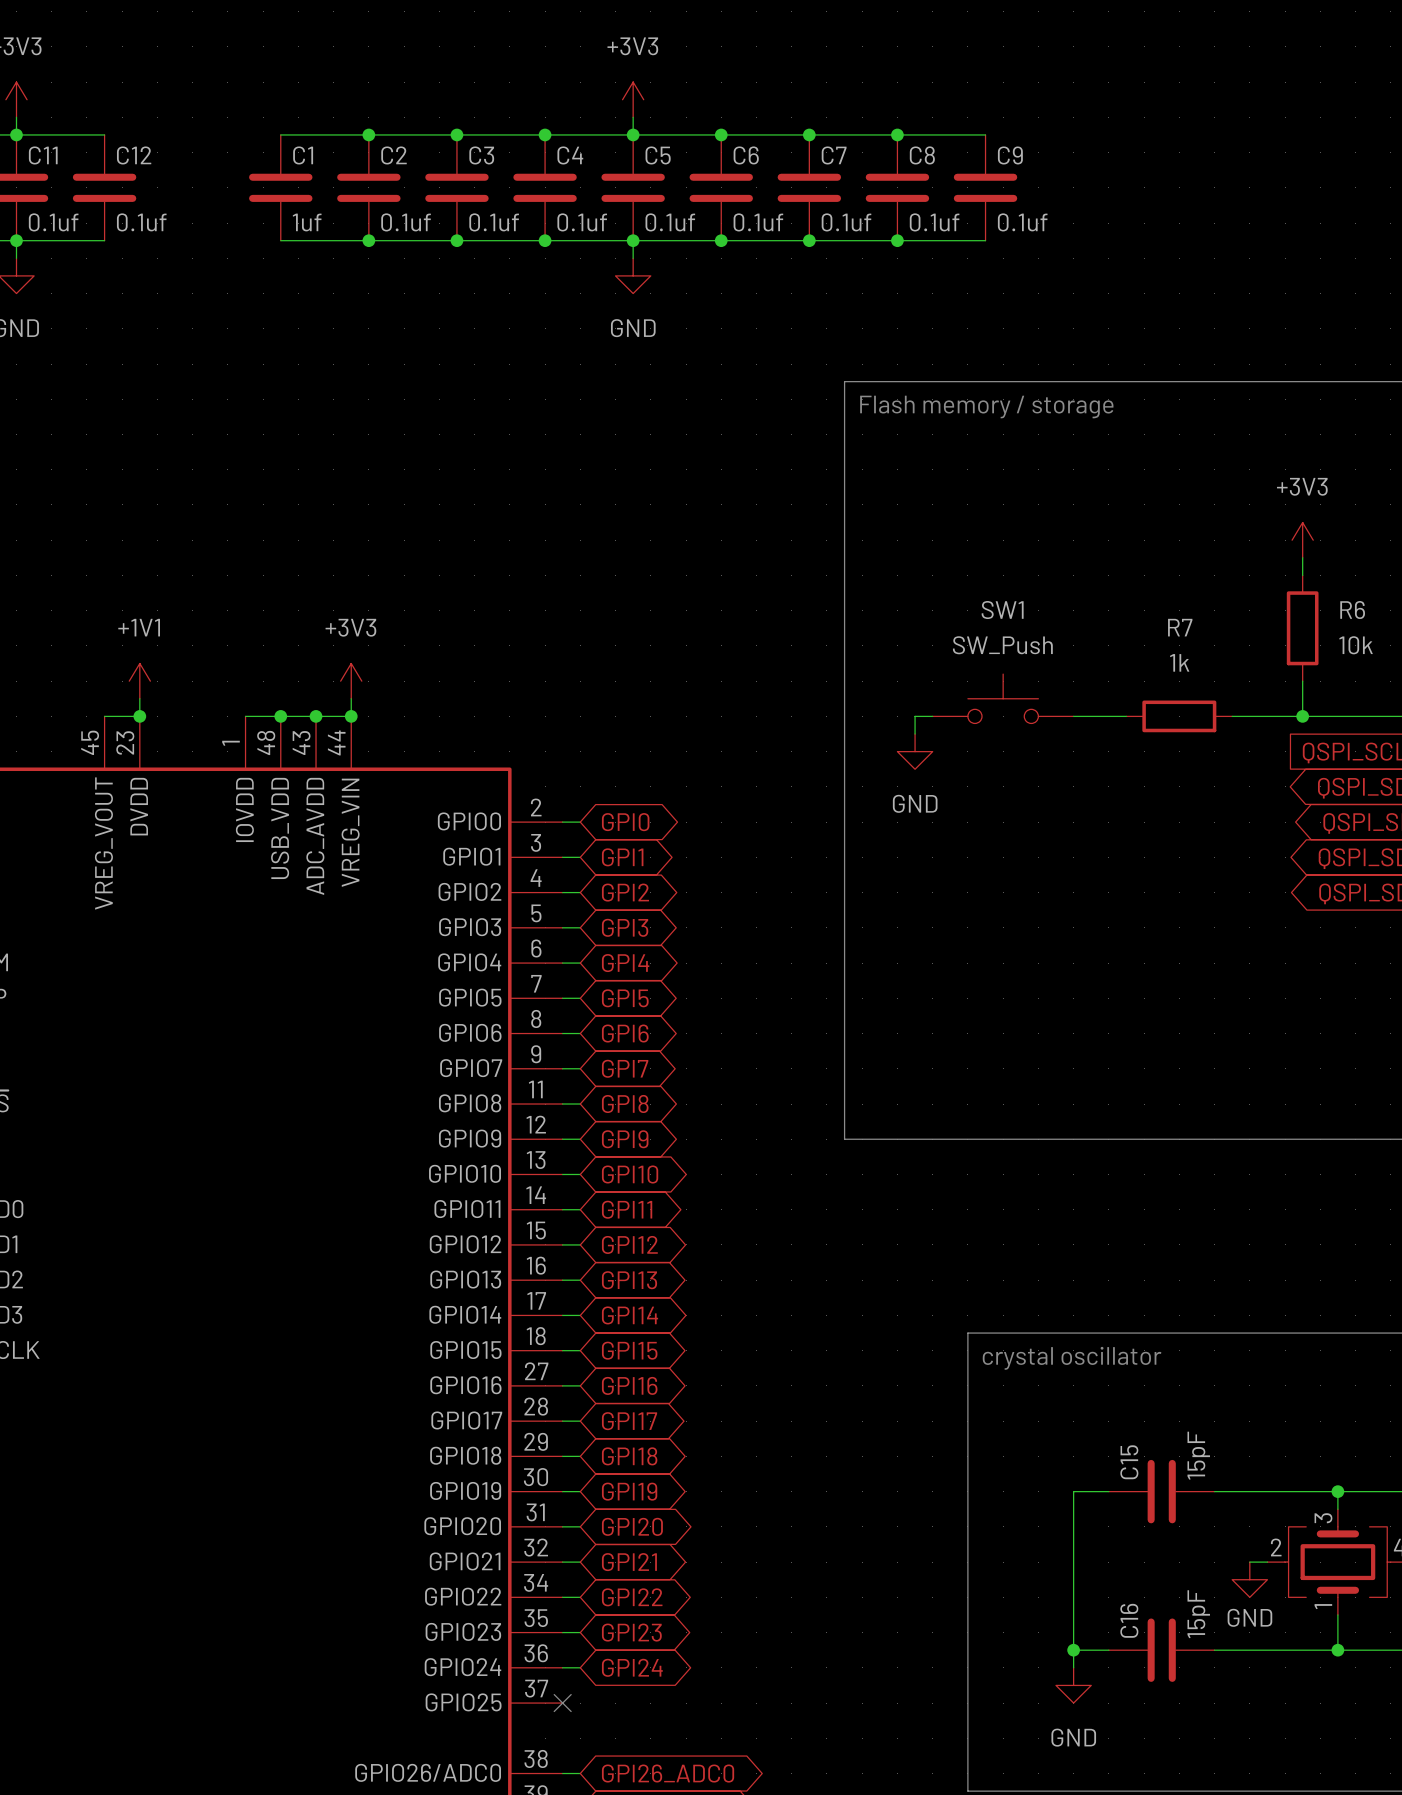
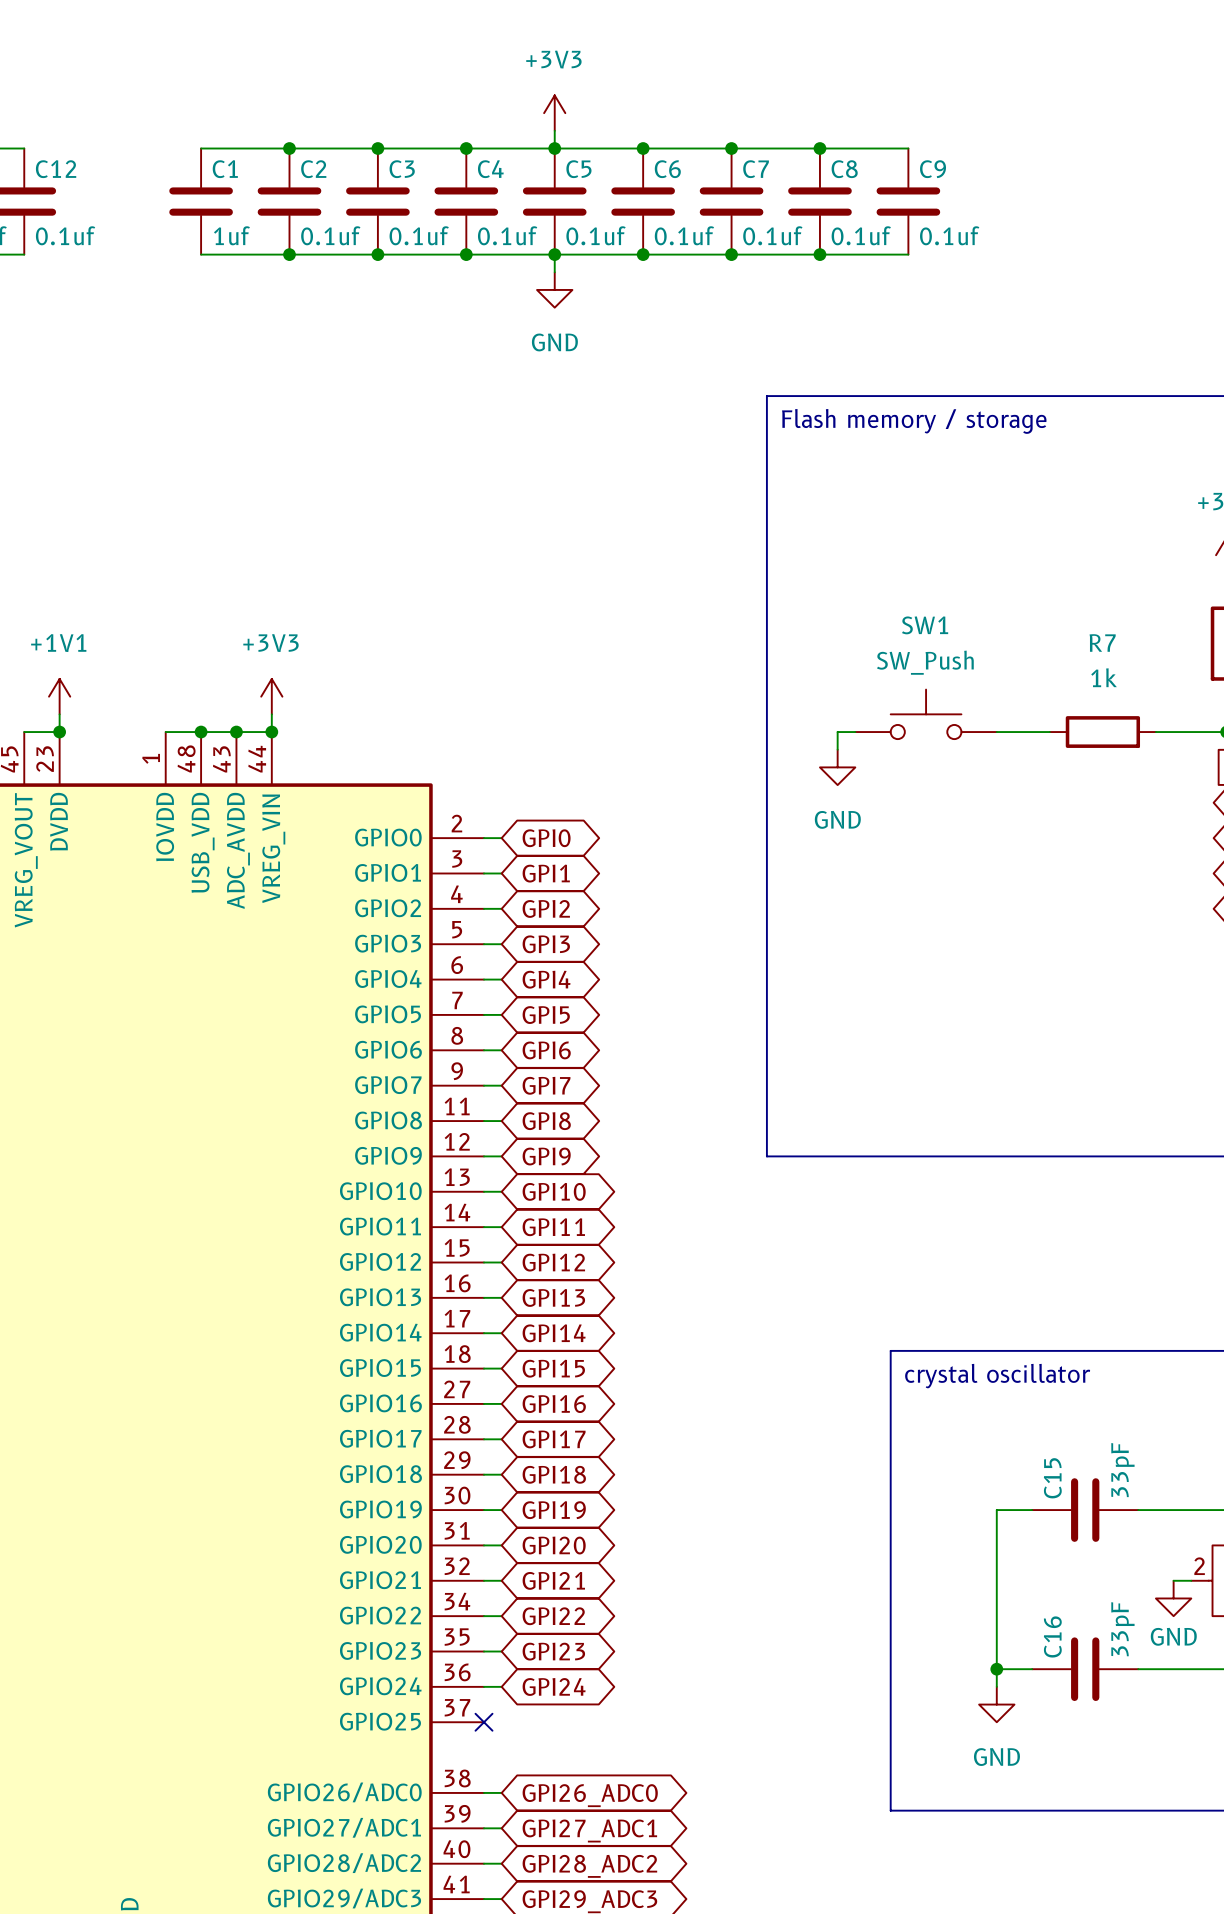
C15 value: 15pF (1198, 1455) -> 33pF (1122, 1470)
C16 value: 15pF (1198, 1614) -> 33pF (1122, 1629)

